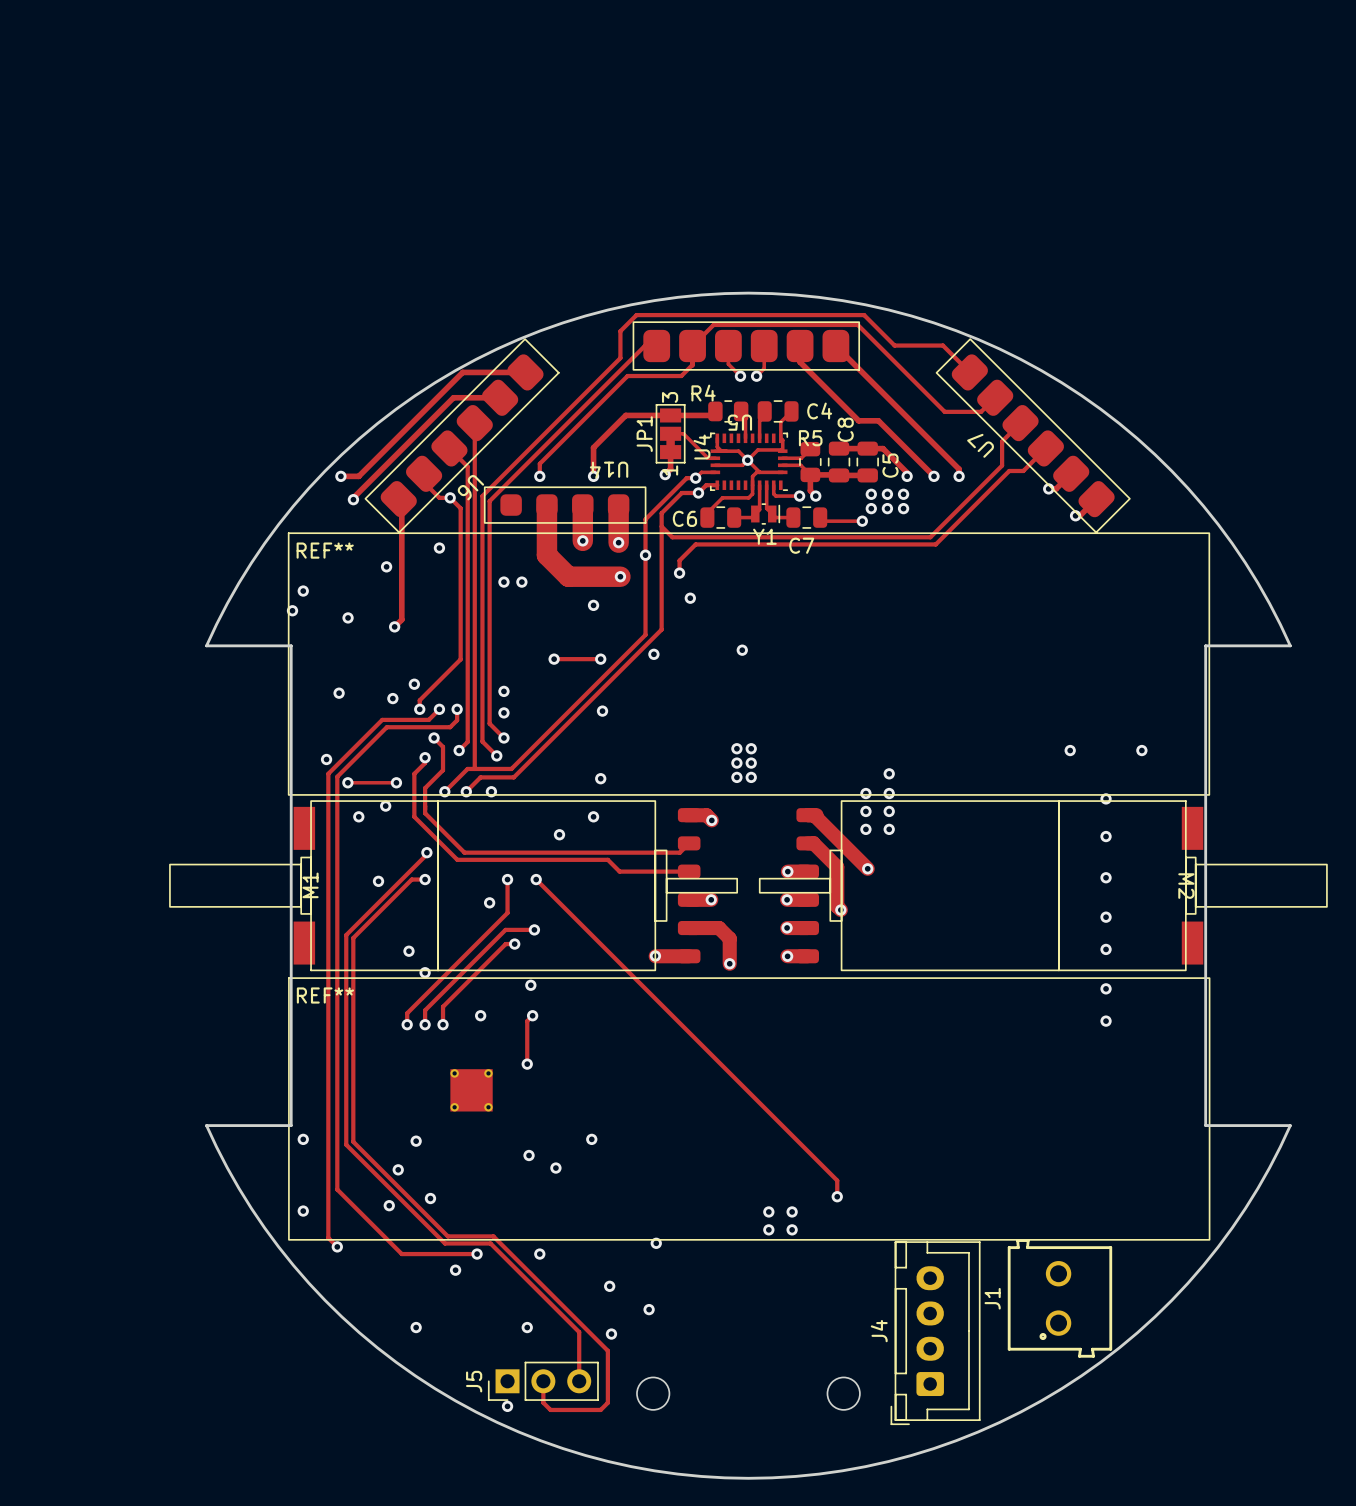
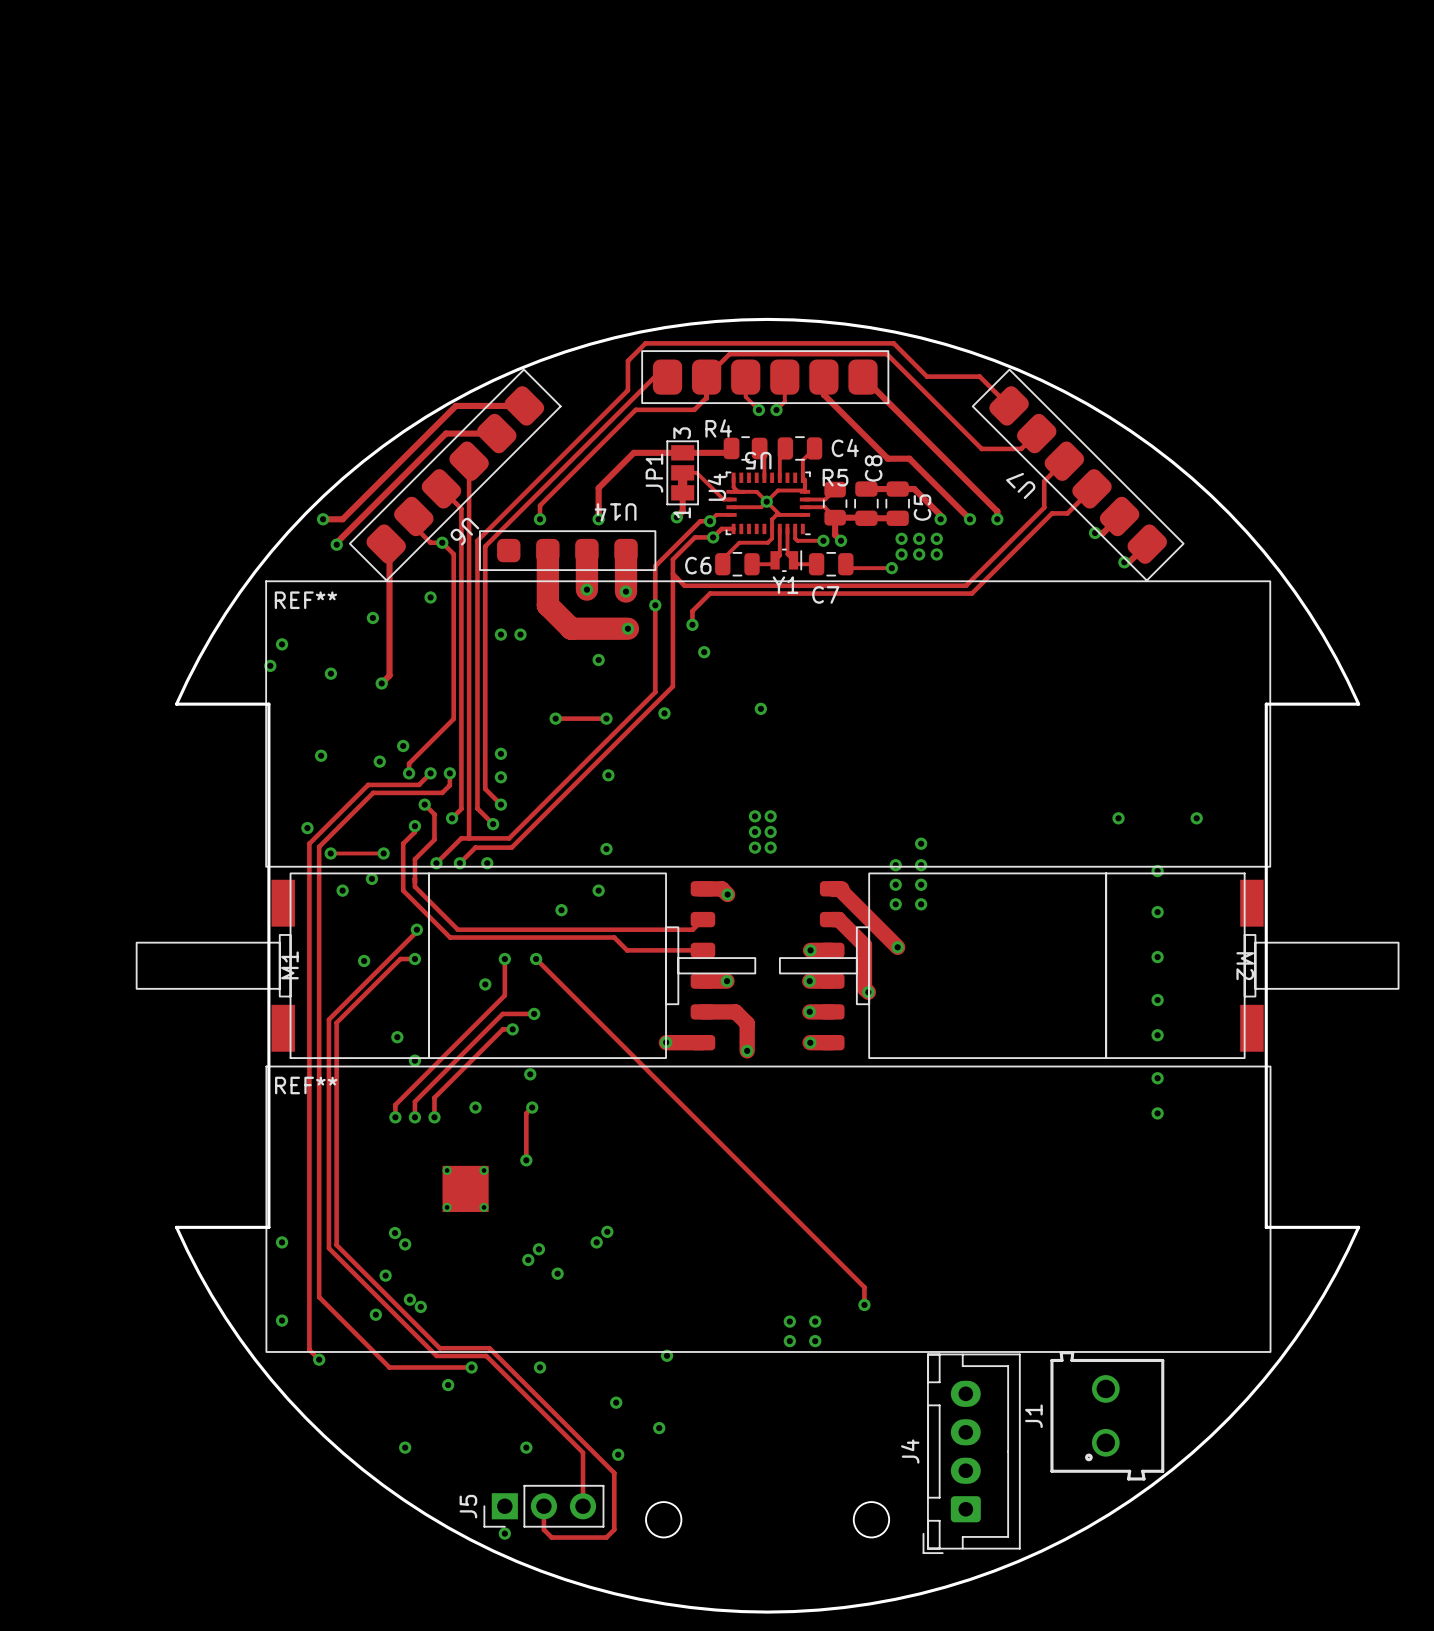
via: none -> (607, 1231)
via: none -> (395, 1233)
via: none -> (538, 1249)
via: none -> (409, 1299)

